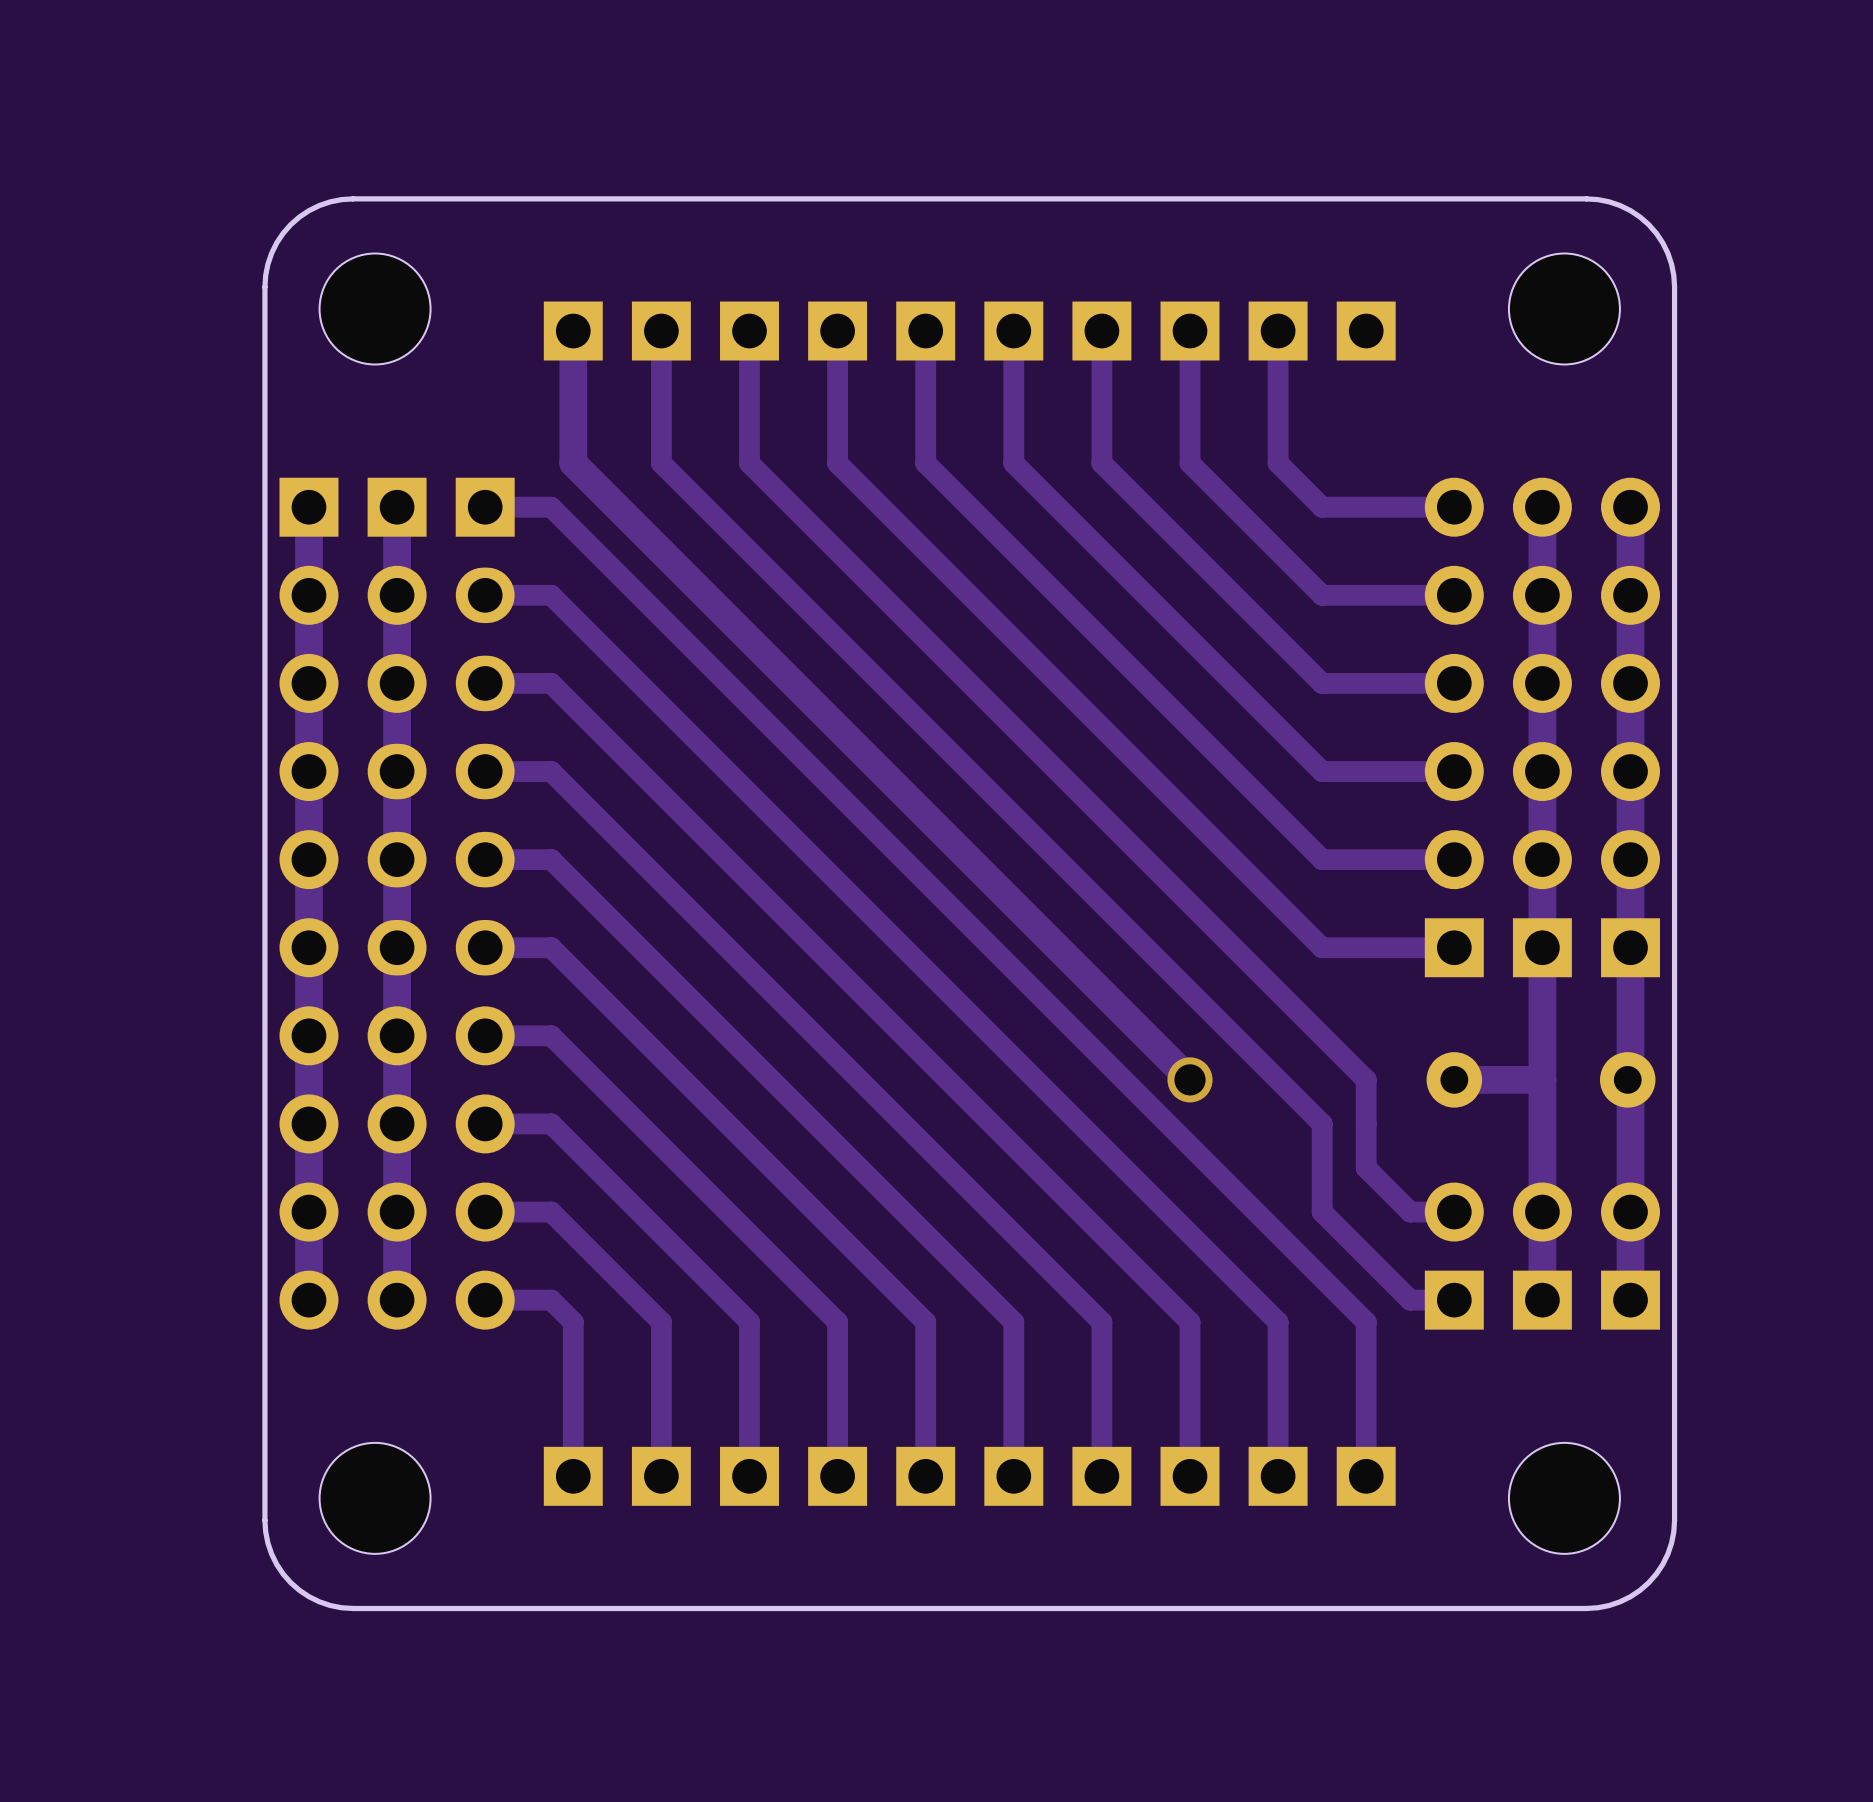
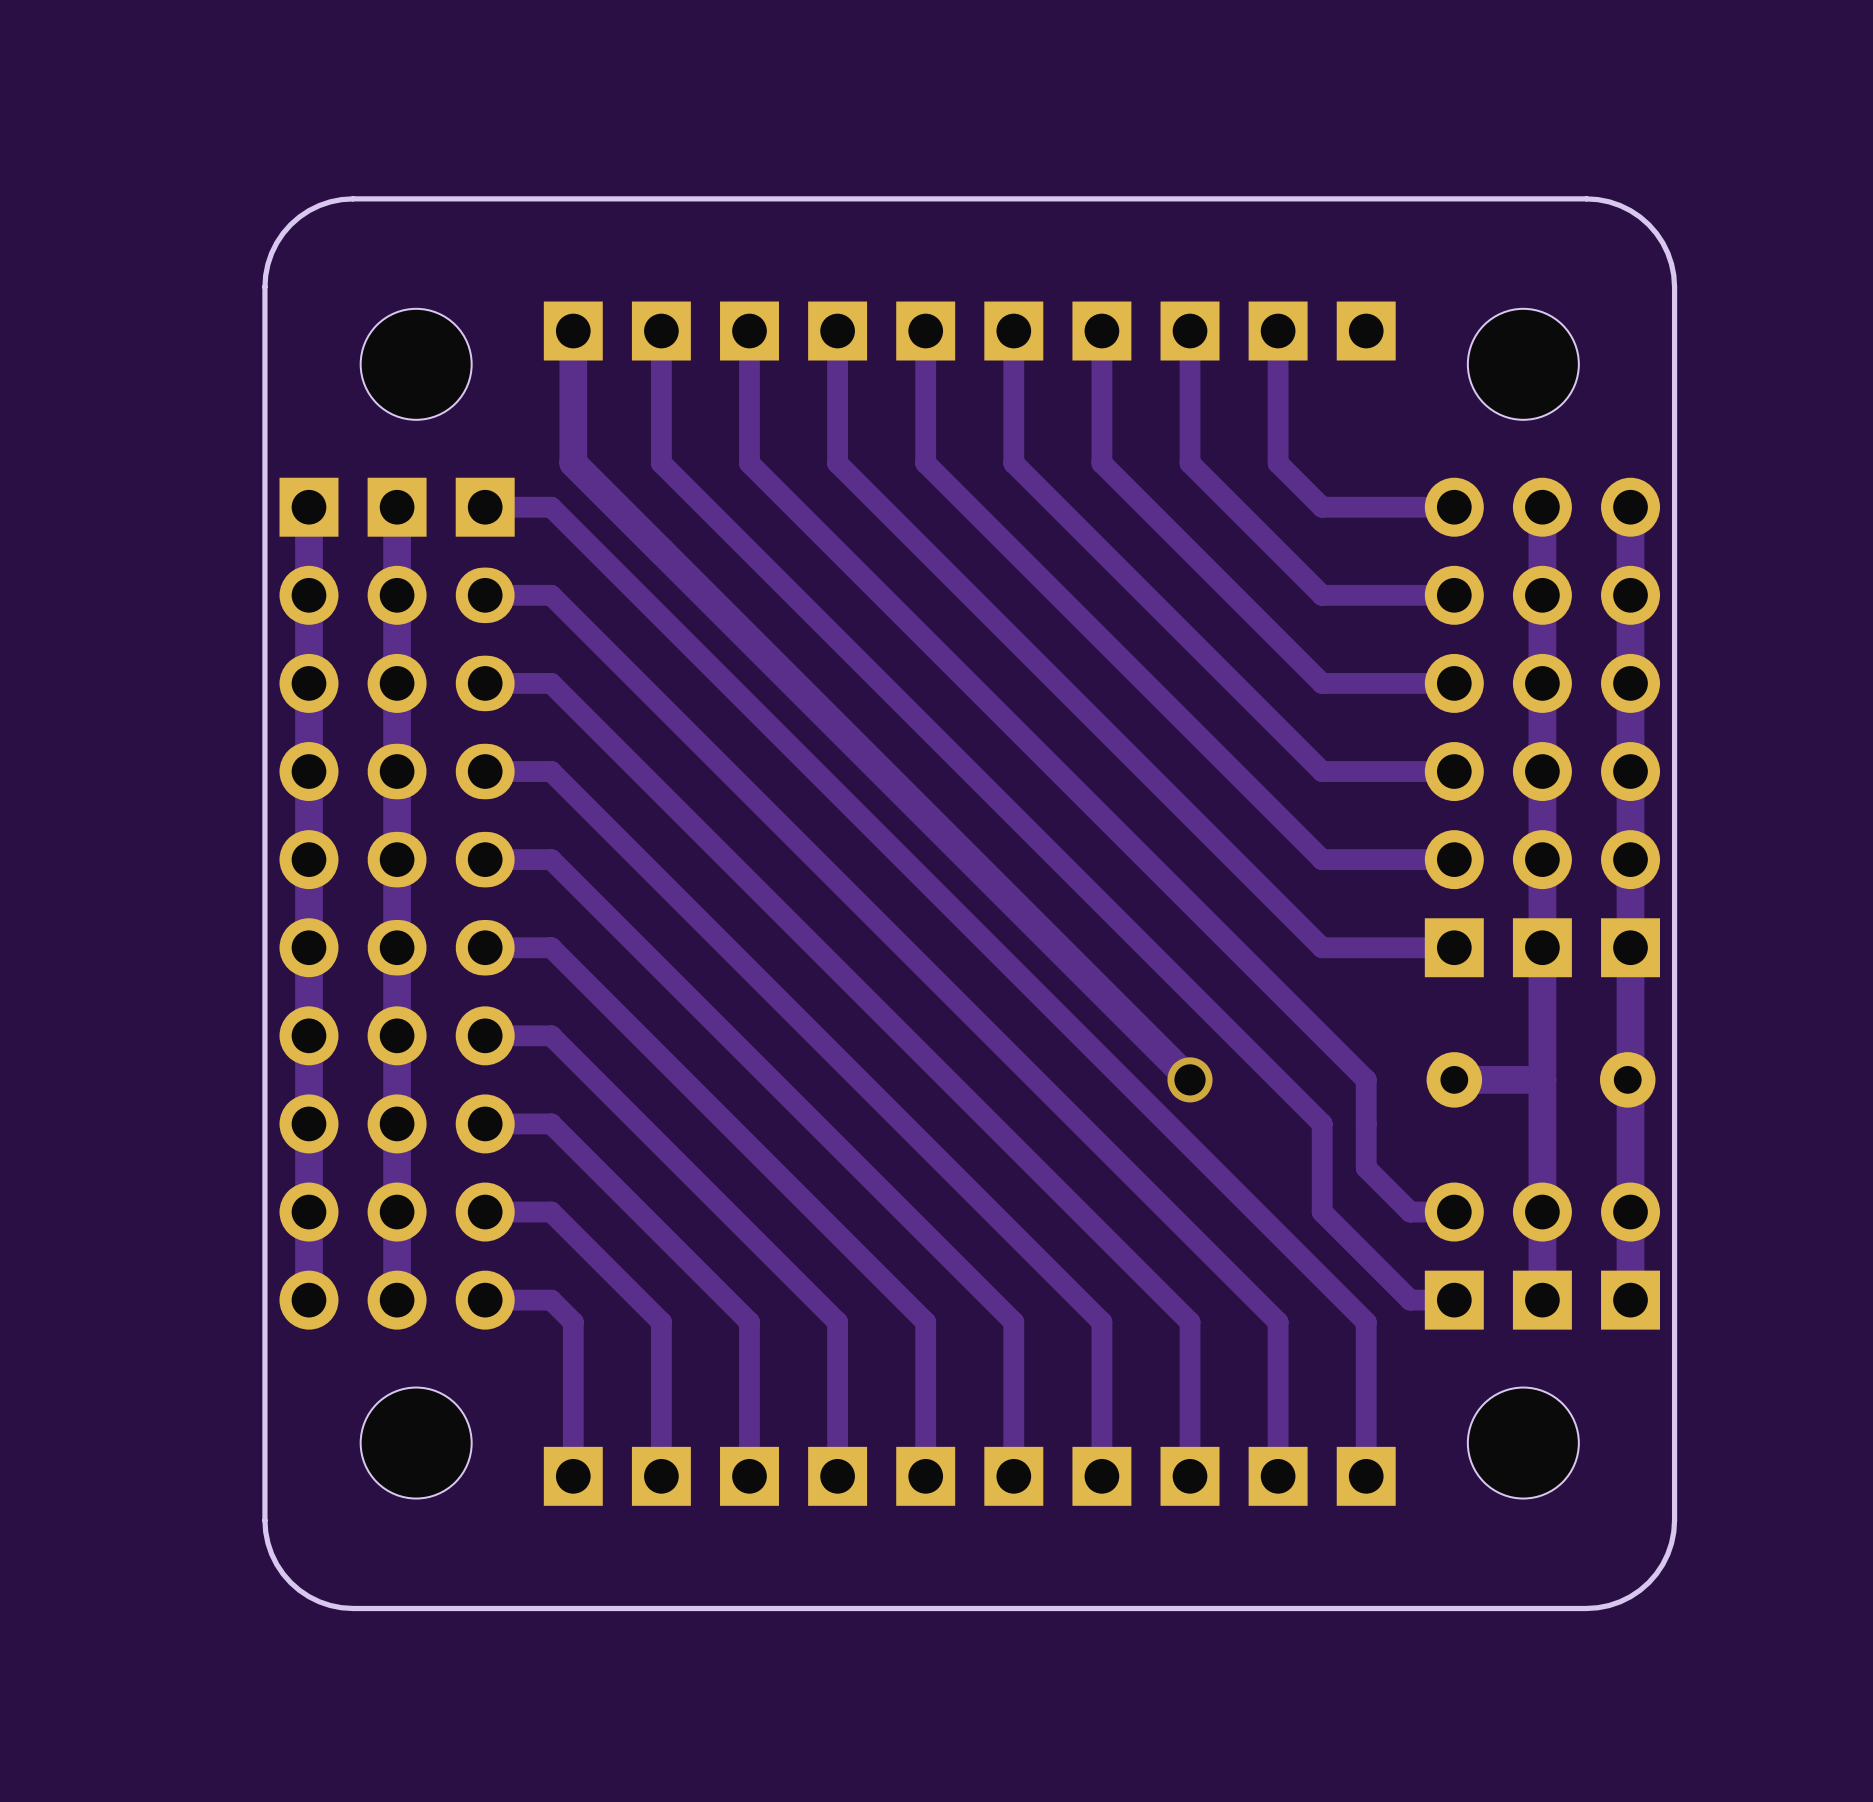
part position: (375, 308) -> (416, 364)
part position: (1564, 308) -> (1523, 364)
part position: (375, 1498) -> (416, 1443)
part position: (1564, 1498) -> (1523, 1443)

